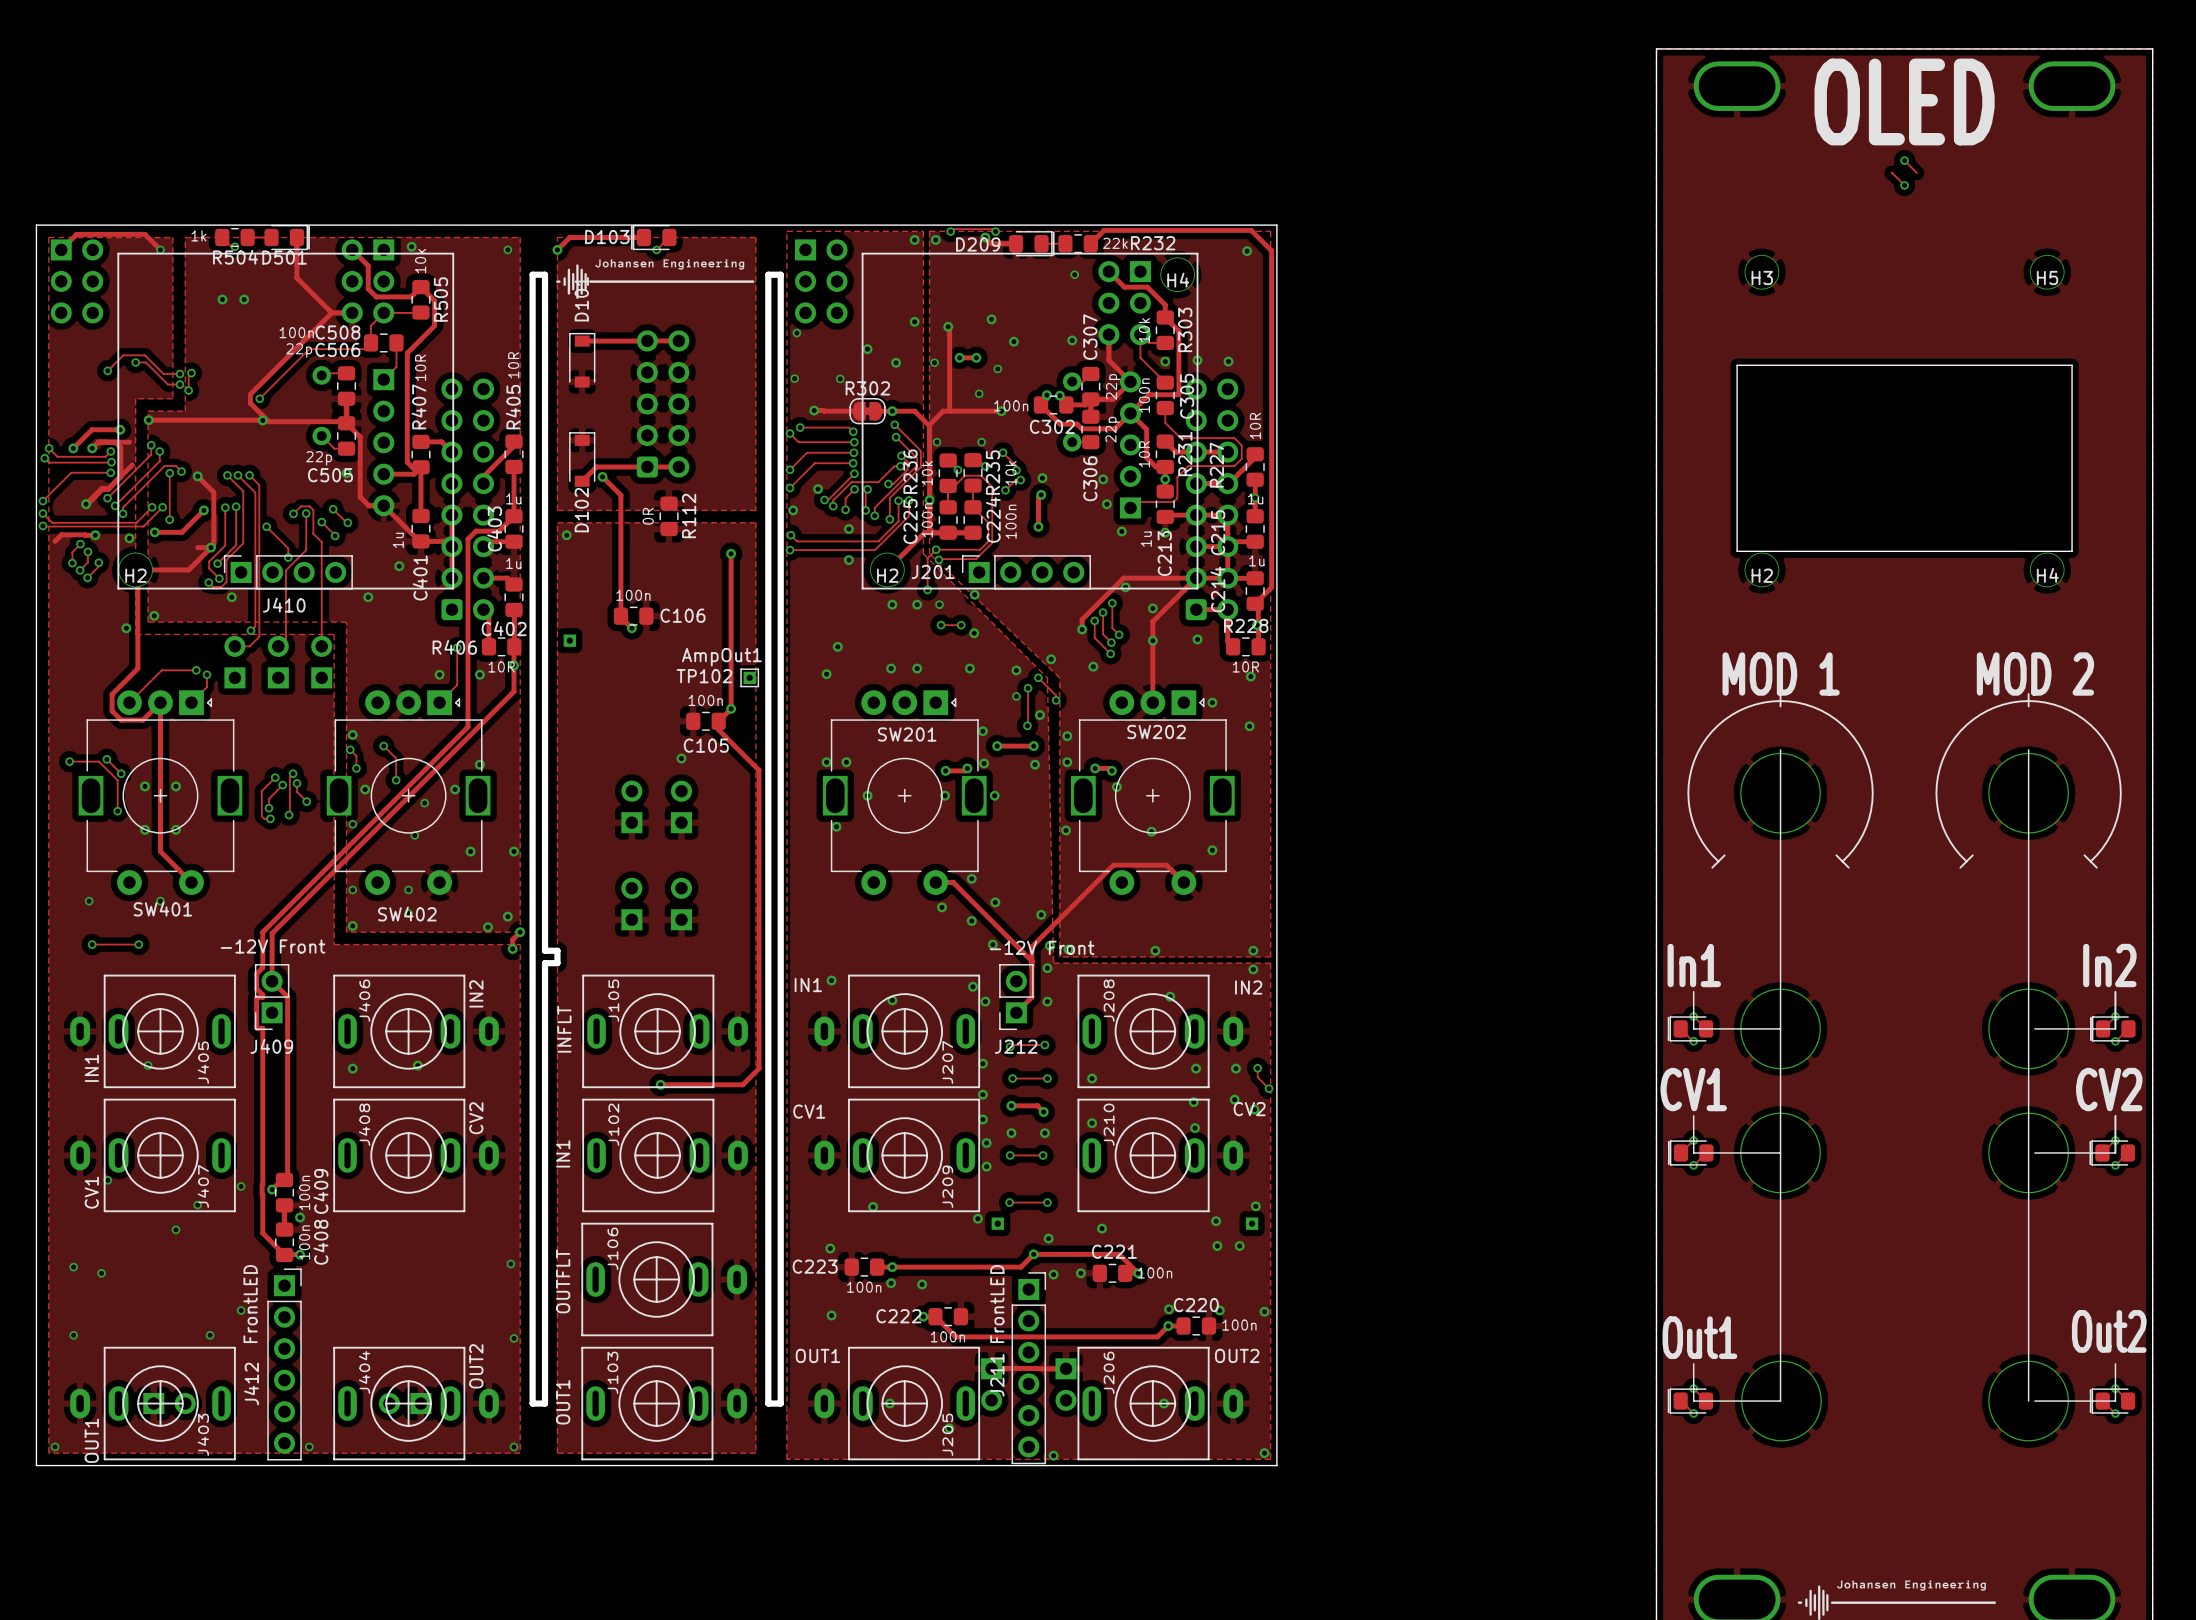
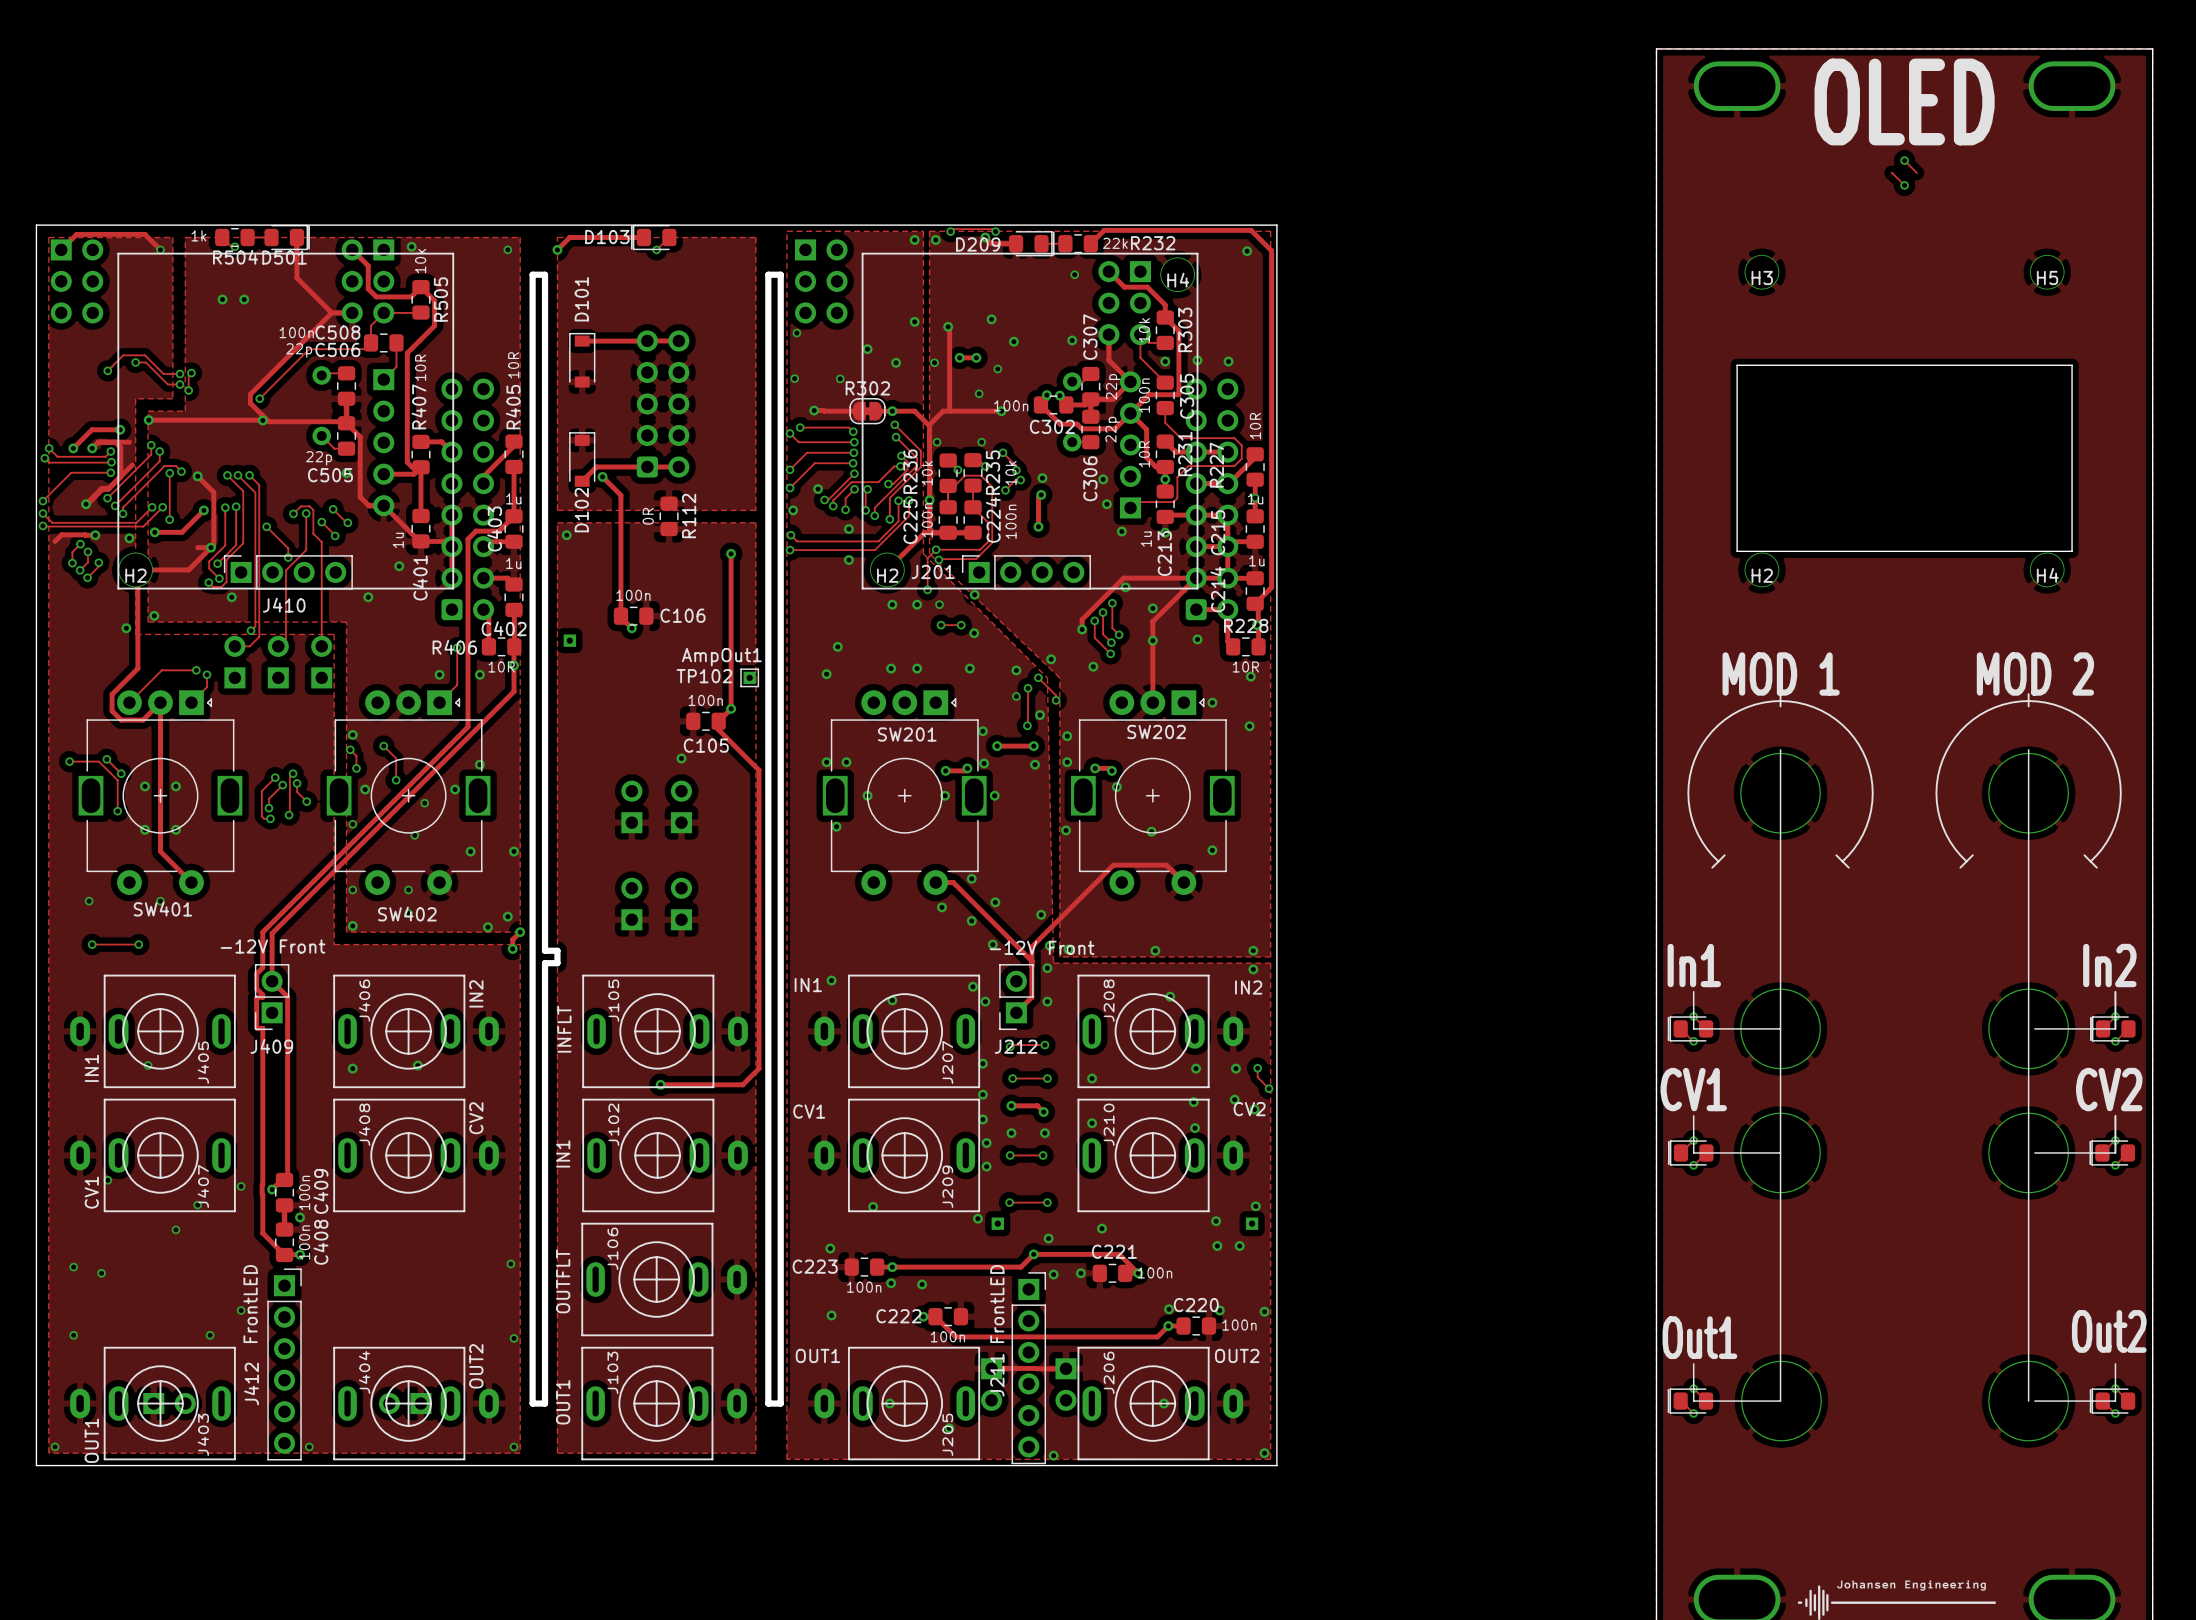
drawing: [556, 259, 755, 299] -> none

